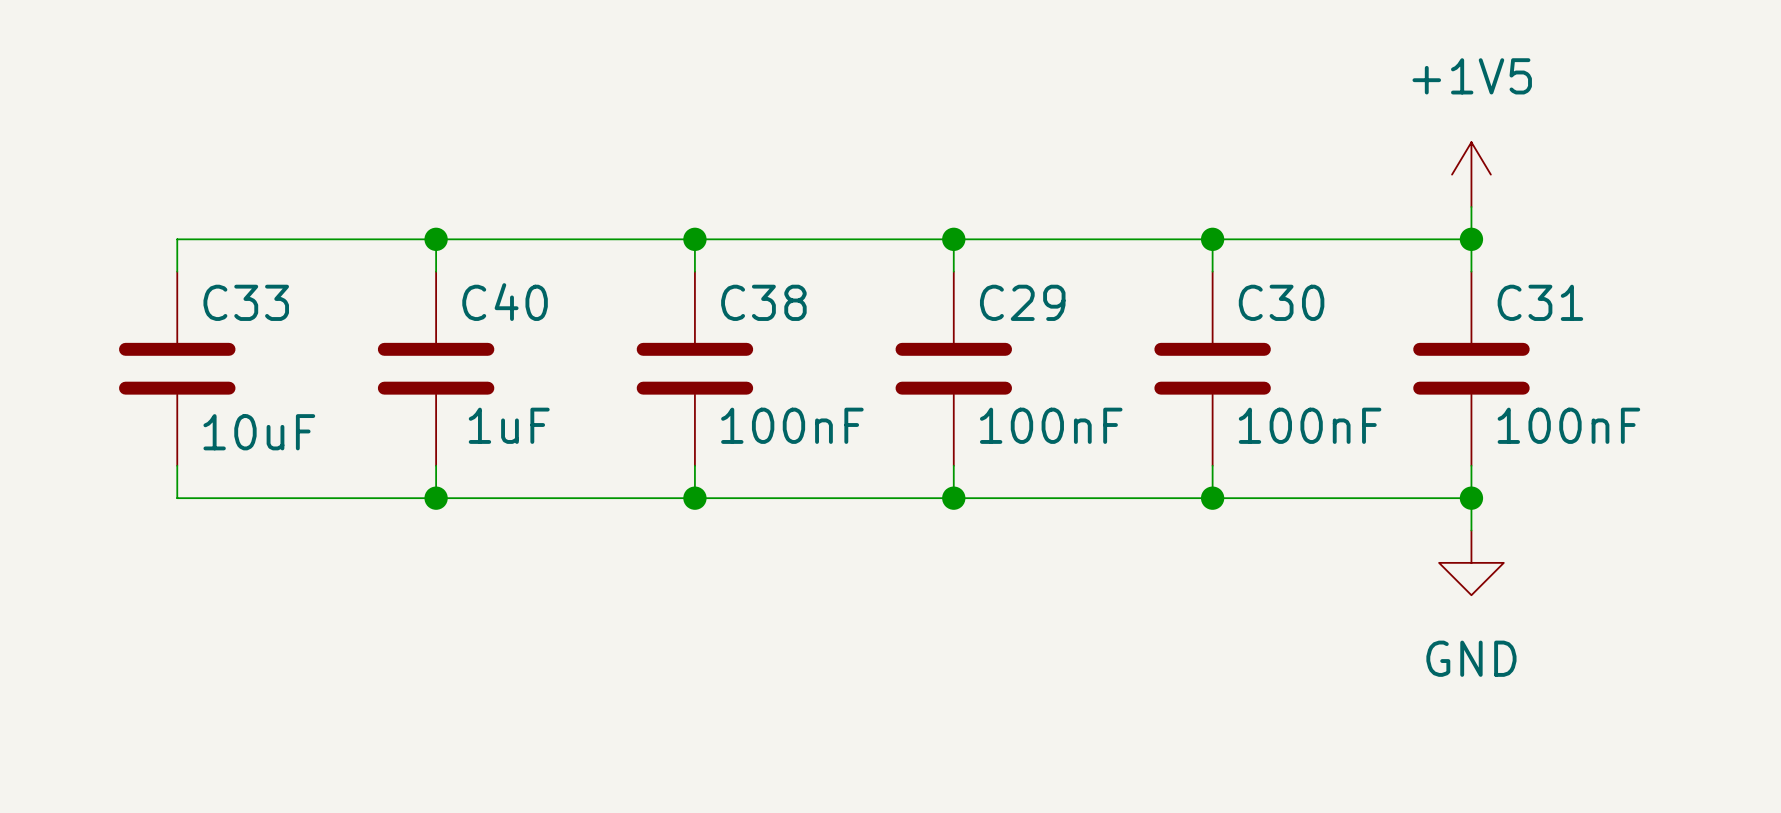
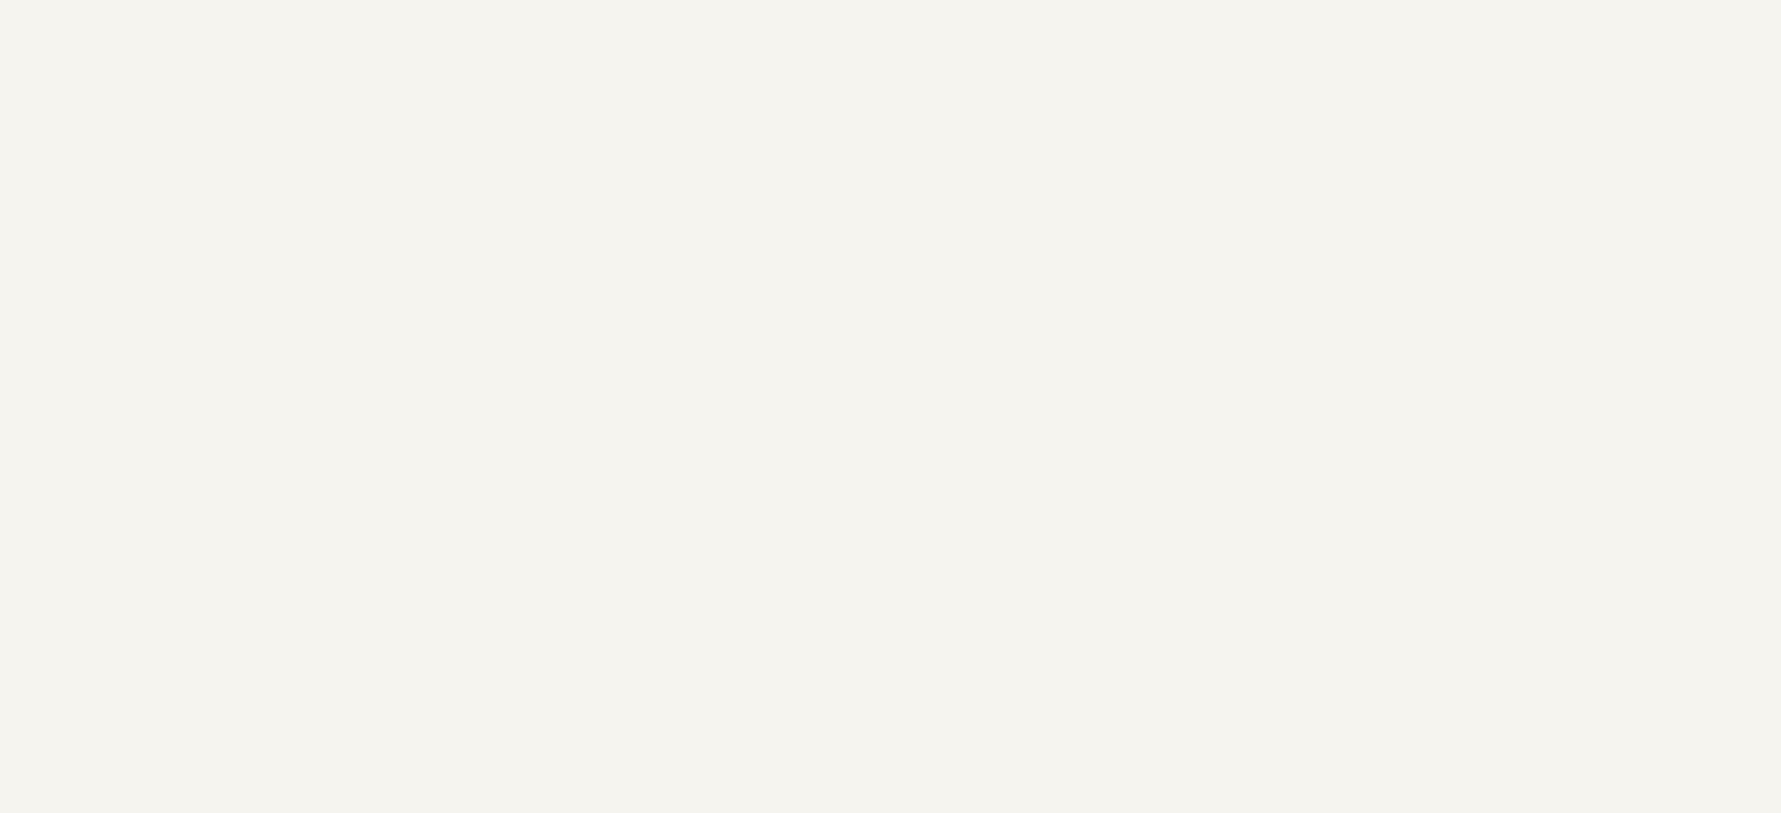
power symbol: +1V5 (1471, 174) -> none
wire: (1471, 206) (1471, 271) -> none
wire: (436, 239) (436, 271) -> none
junction: (436, 239) -> none
wire: (694, 239) (694, 271) -> none
junction: (694, 239) -> none
wire: (953, 239) (953, 271) -> none
junction: (953, 239) -> none
wire: (1212, 239) (1212, 271) -> none
junction: (1212, 239) -> none
wire: (1471, 239) (177, 239) (177, 271) -> none
junction: (1471, 239) -> none
C33: 10uF (177, 368) -> none
C40: 1uF (436, 368) -> none
C38: 100nF (694, 368) -> none
C29: 100nF (953, 368) -> none
C30: 100nF (1212, 368) -> none
C31: 100nF (1471, 368) -> none
wire: (177, 465) (177, 498) (1471, 498) -> none
wire: (436, 465) (436, 498) -> none
wire: (694, 465) (694, 498) -> none
wire: (953, 465) (953, 498) -> none
wire: (1212, 465) (1212, 498) -> none
wire: (1471, 465) (1471, 530) -> none
junction: (436, 498) -> none
junction: (694, 498) -> none
junction: (953, 498) -> none
junction: (1212, 498) -> none
junction: (1471, 498) -> none
power symbol: GND (1471, 562) -> none

